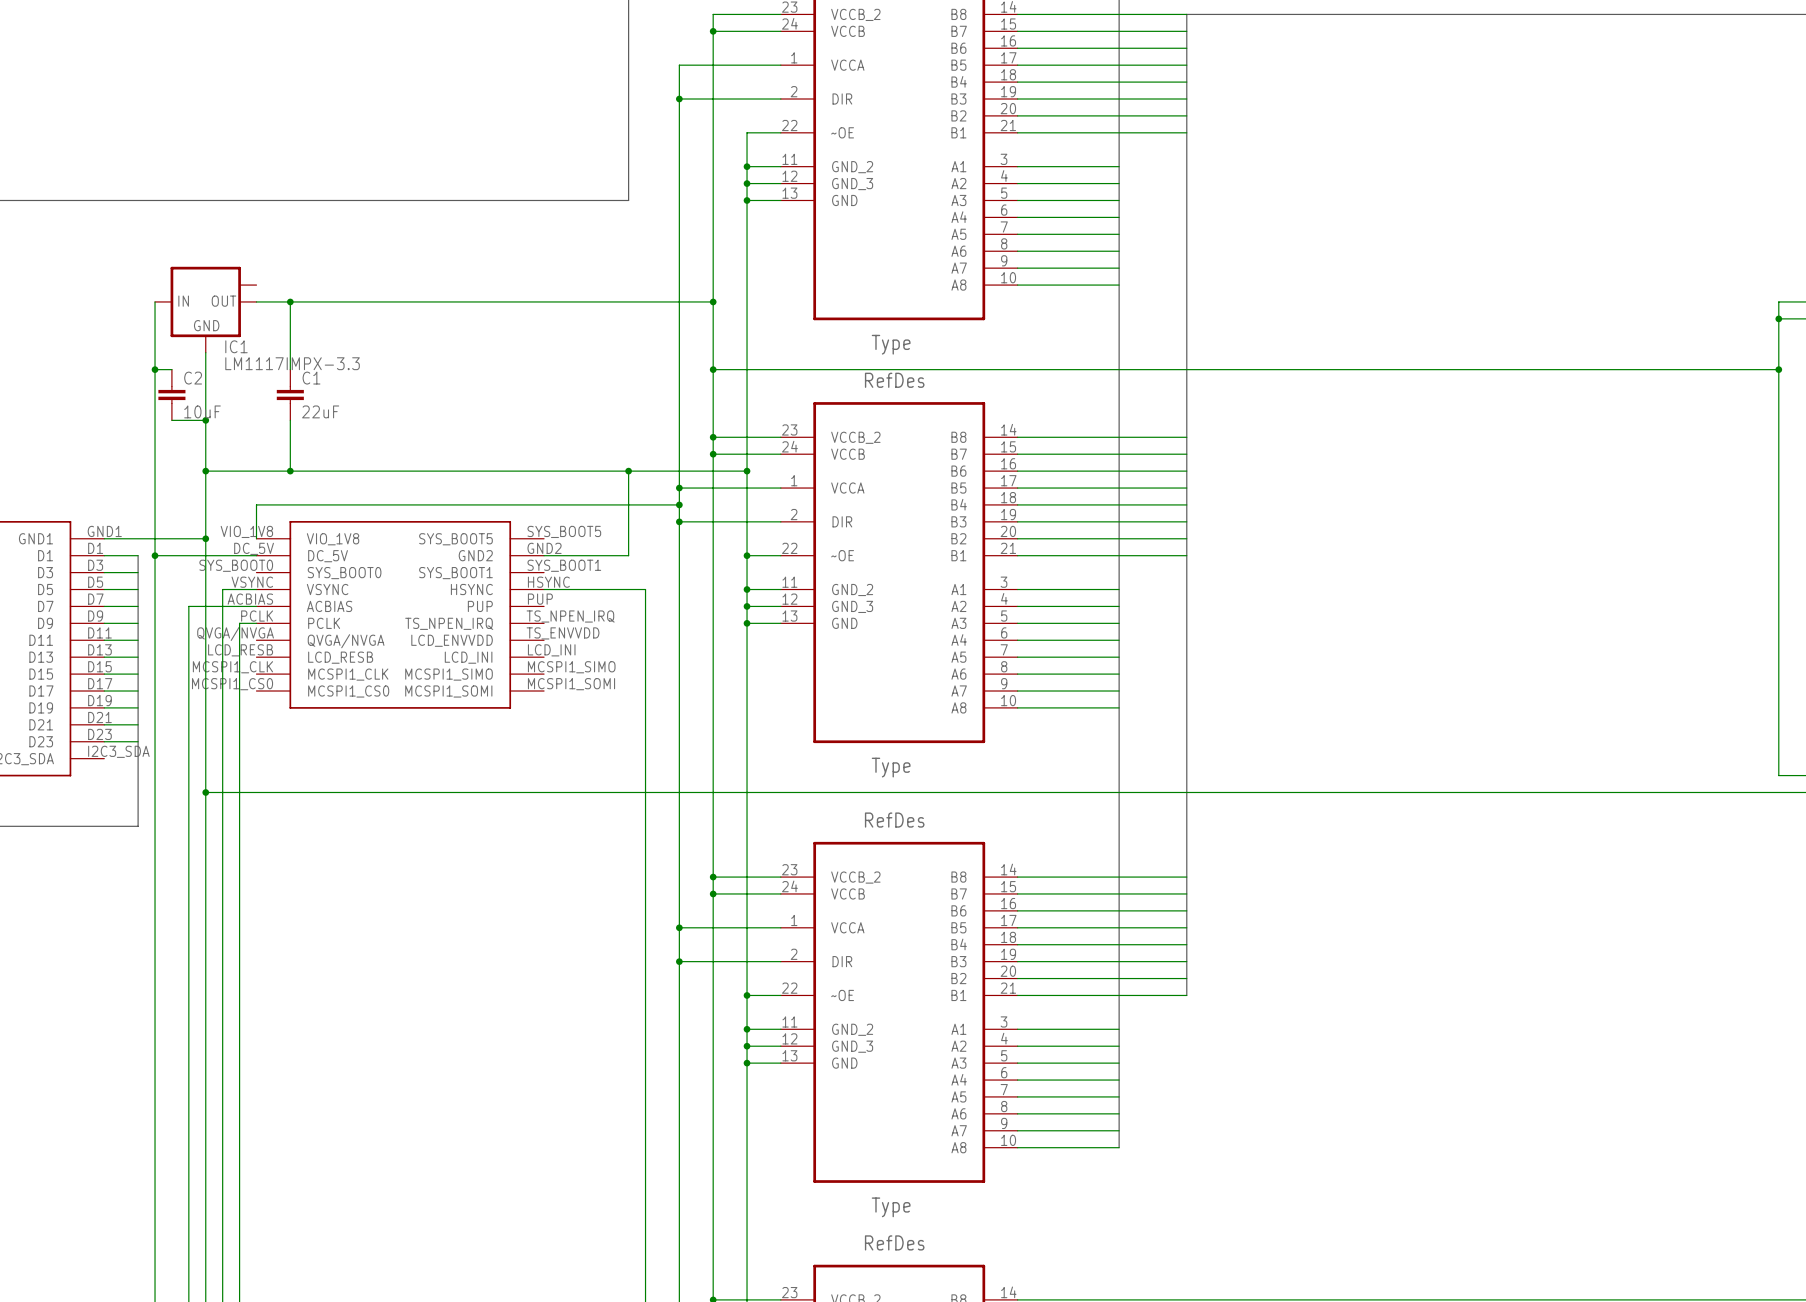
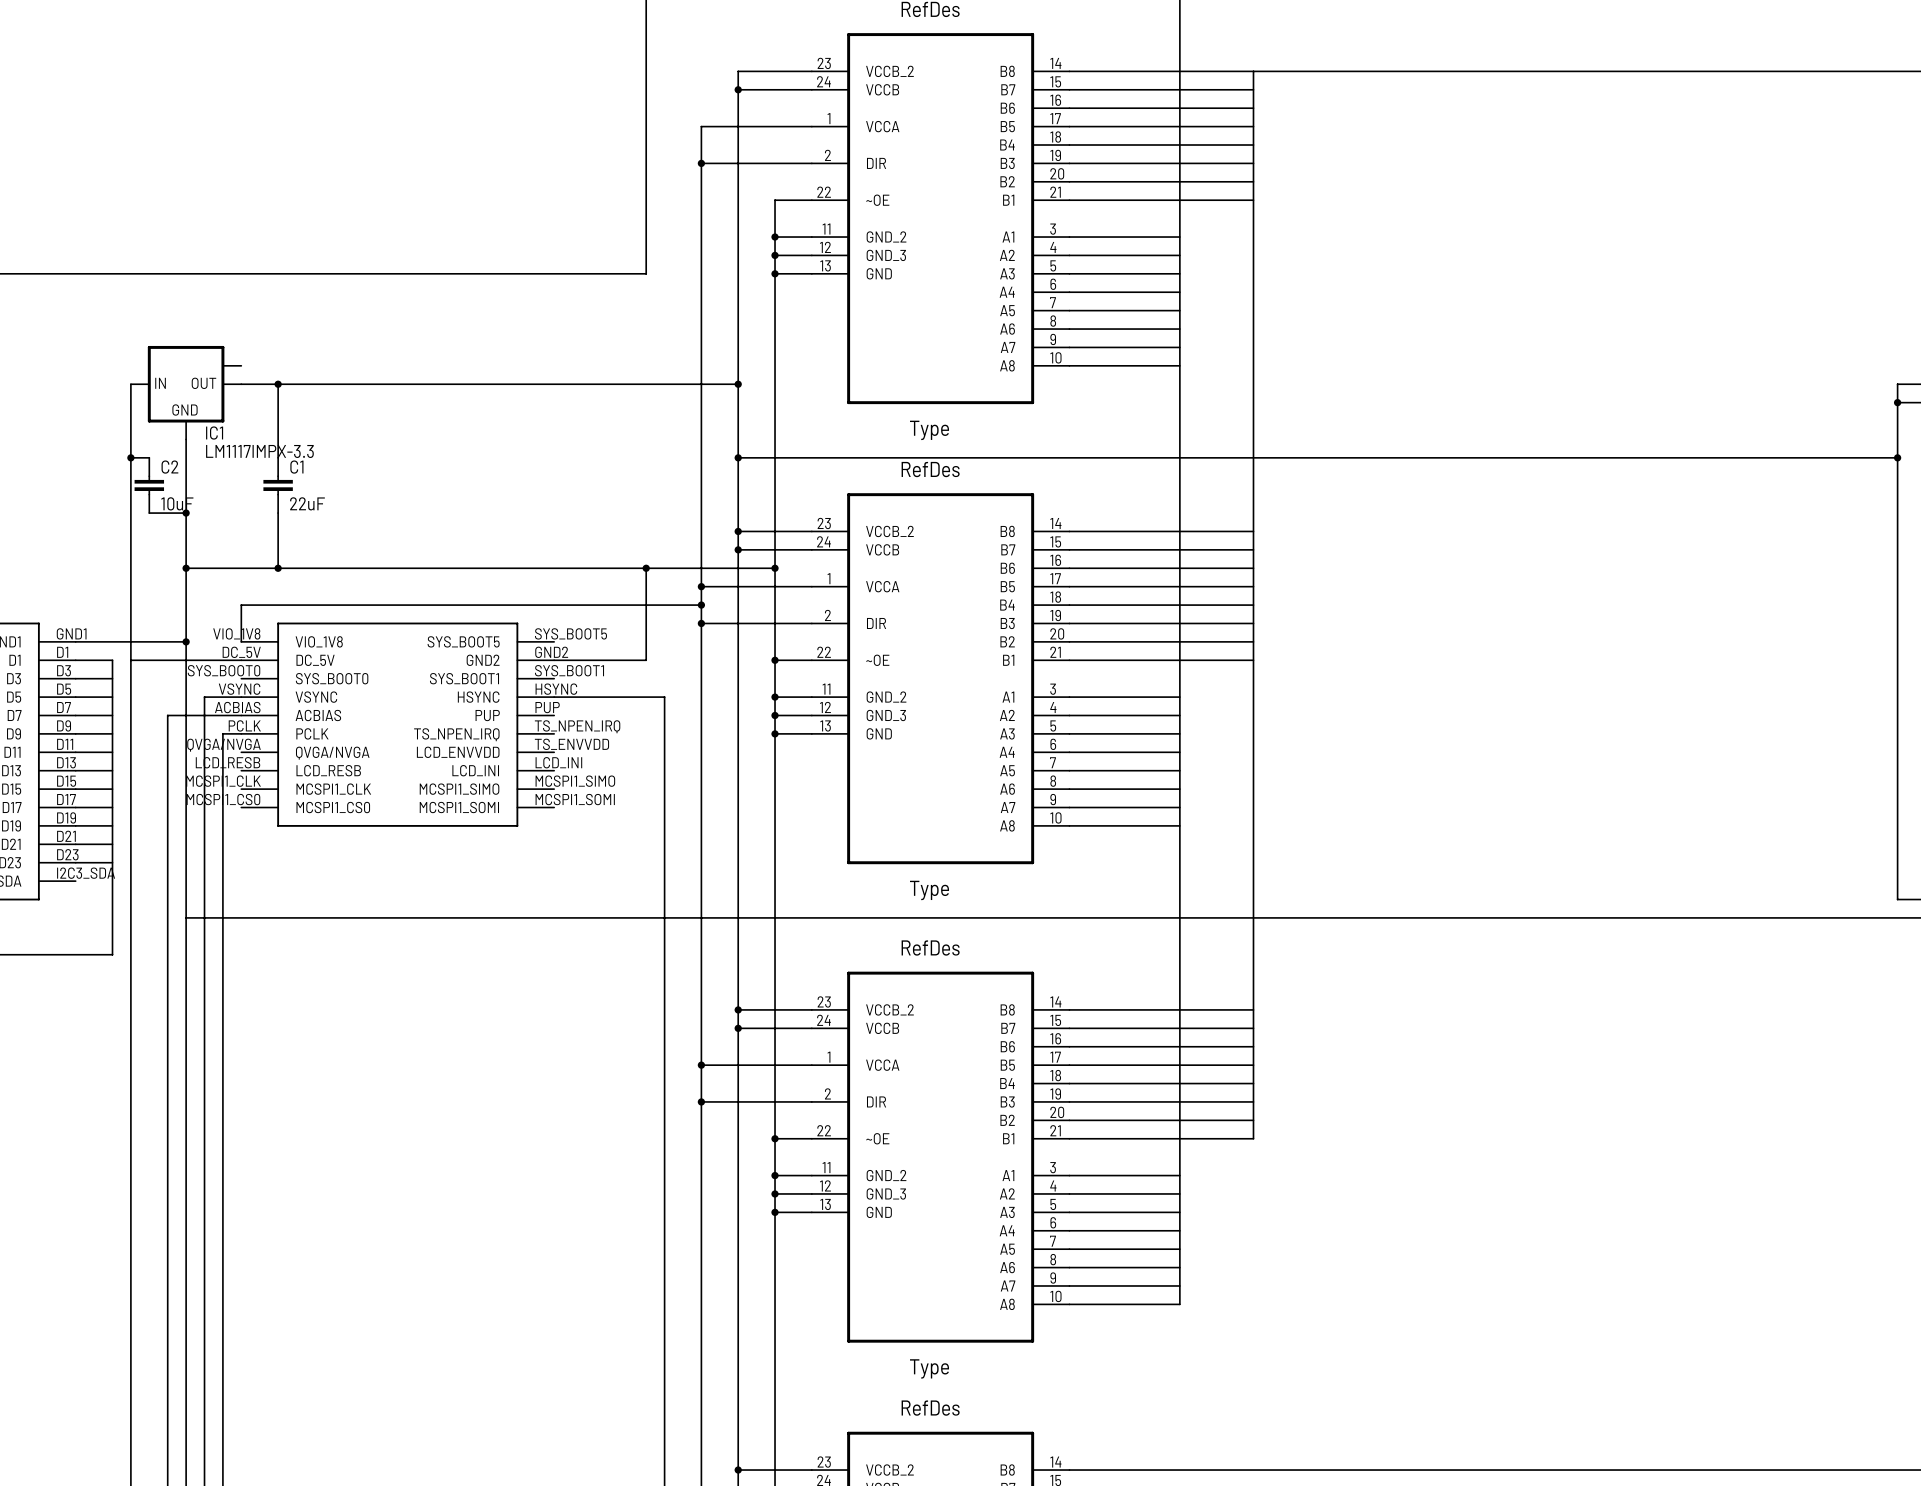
junction: (155, 555) -> none
junction: (205, 792) -> none

